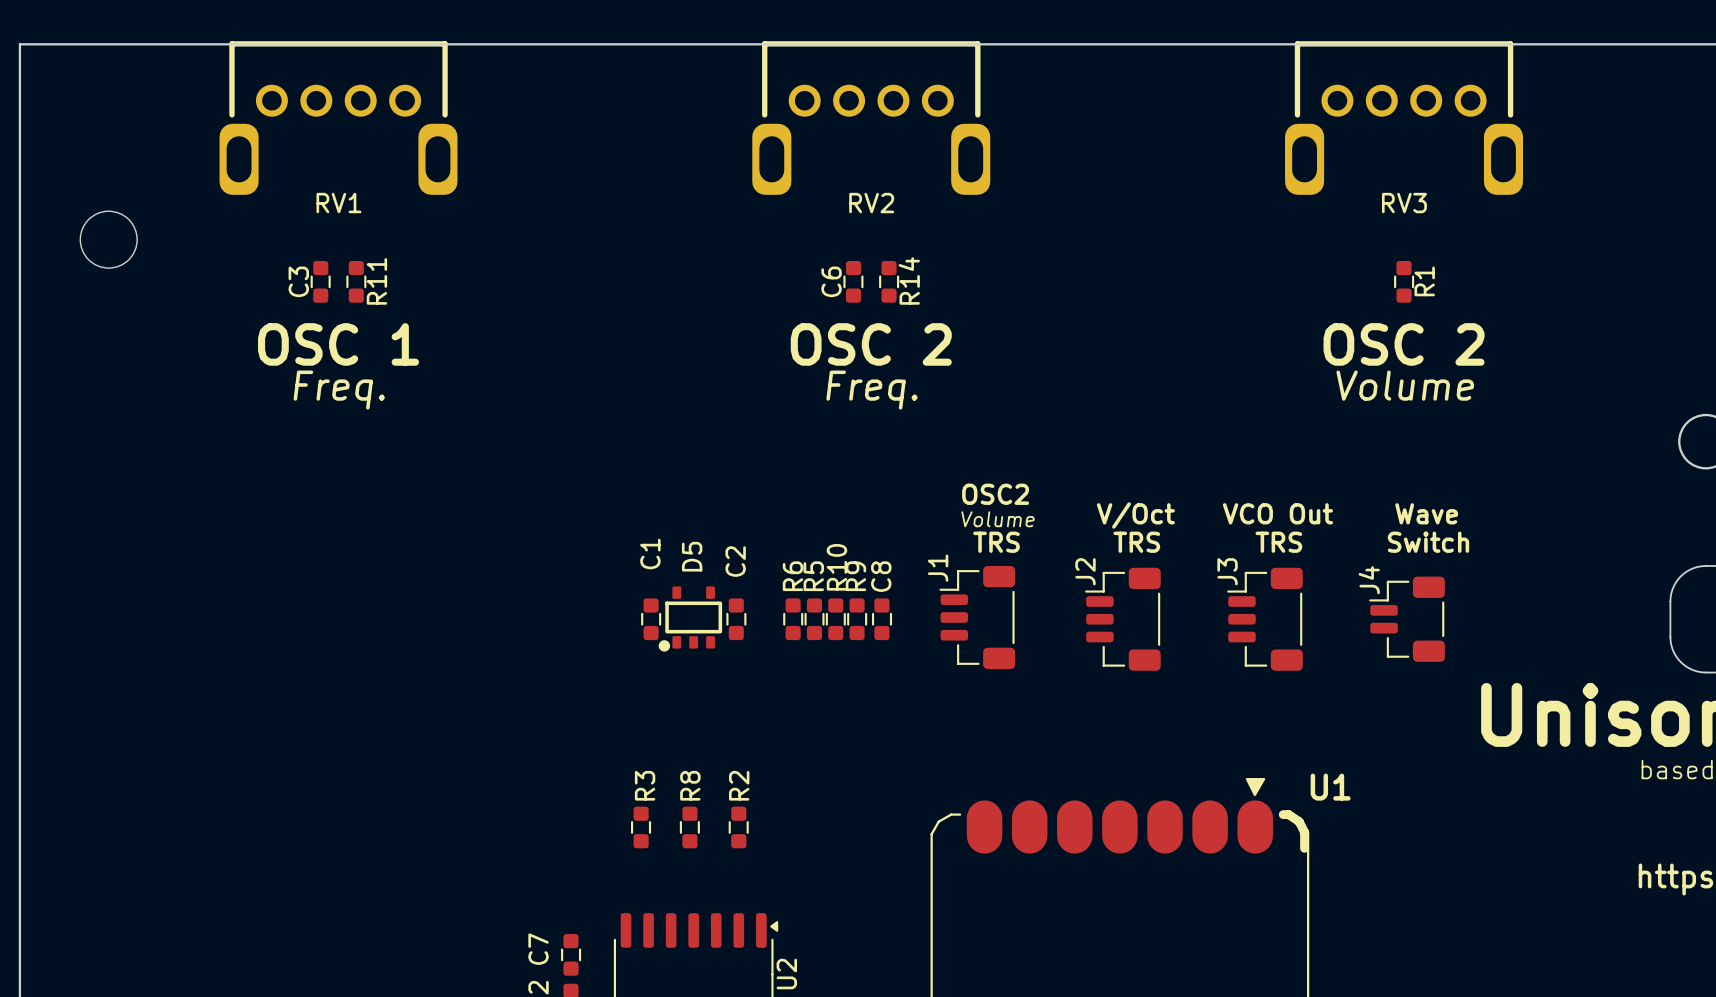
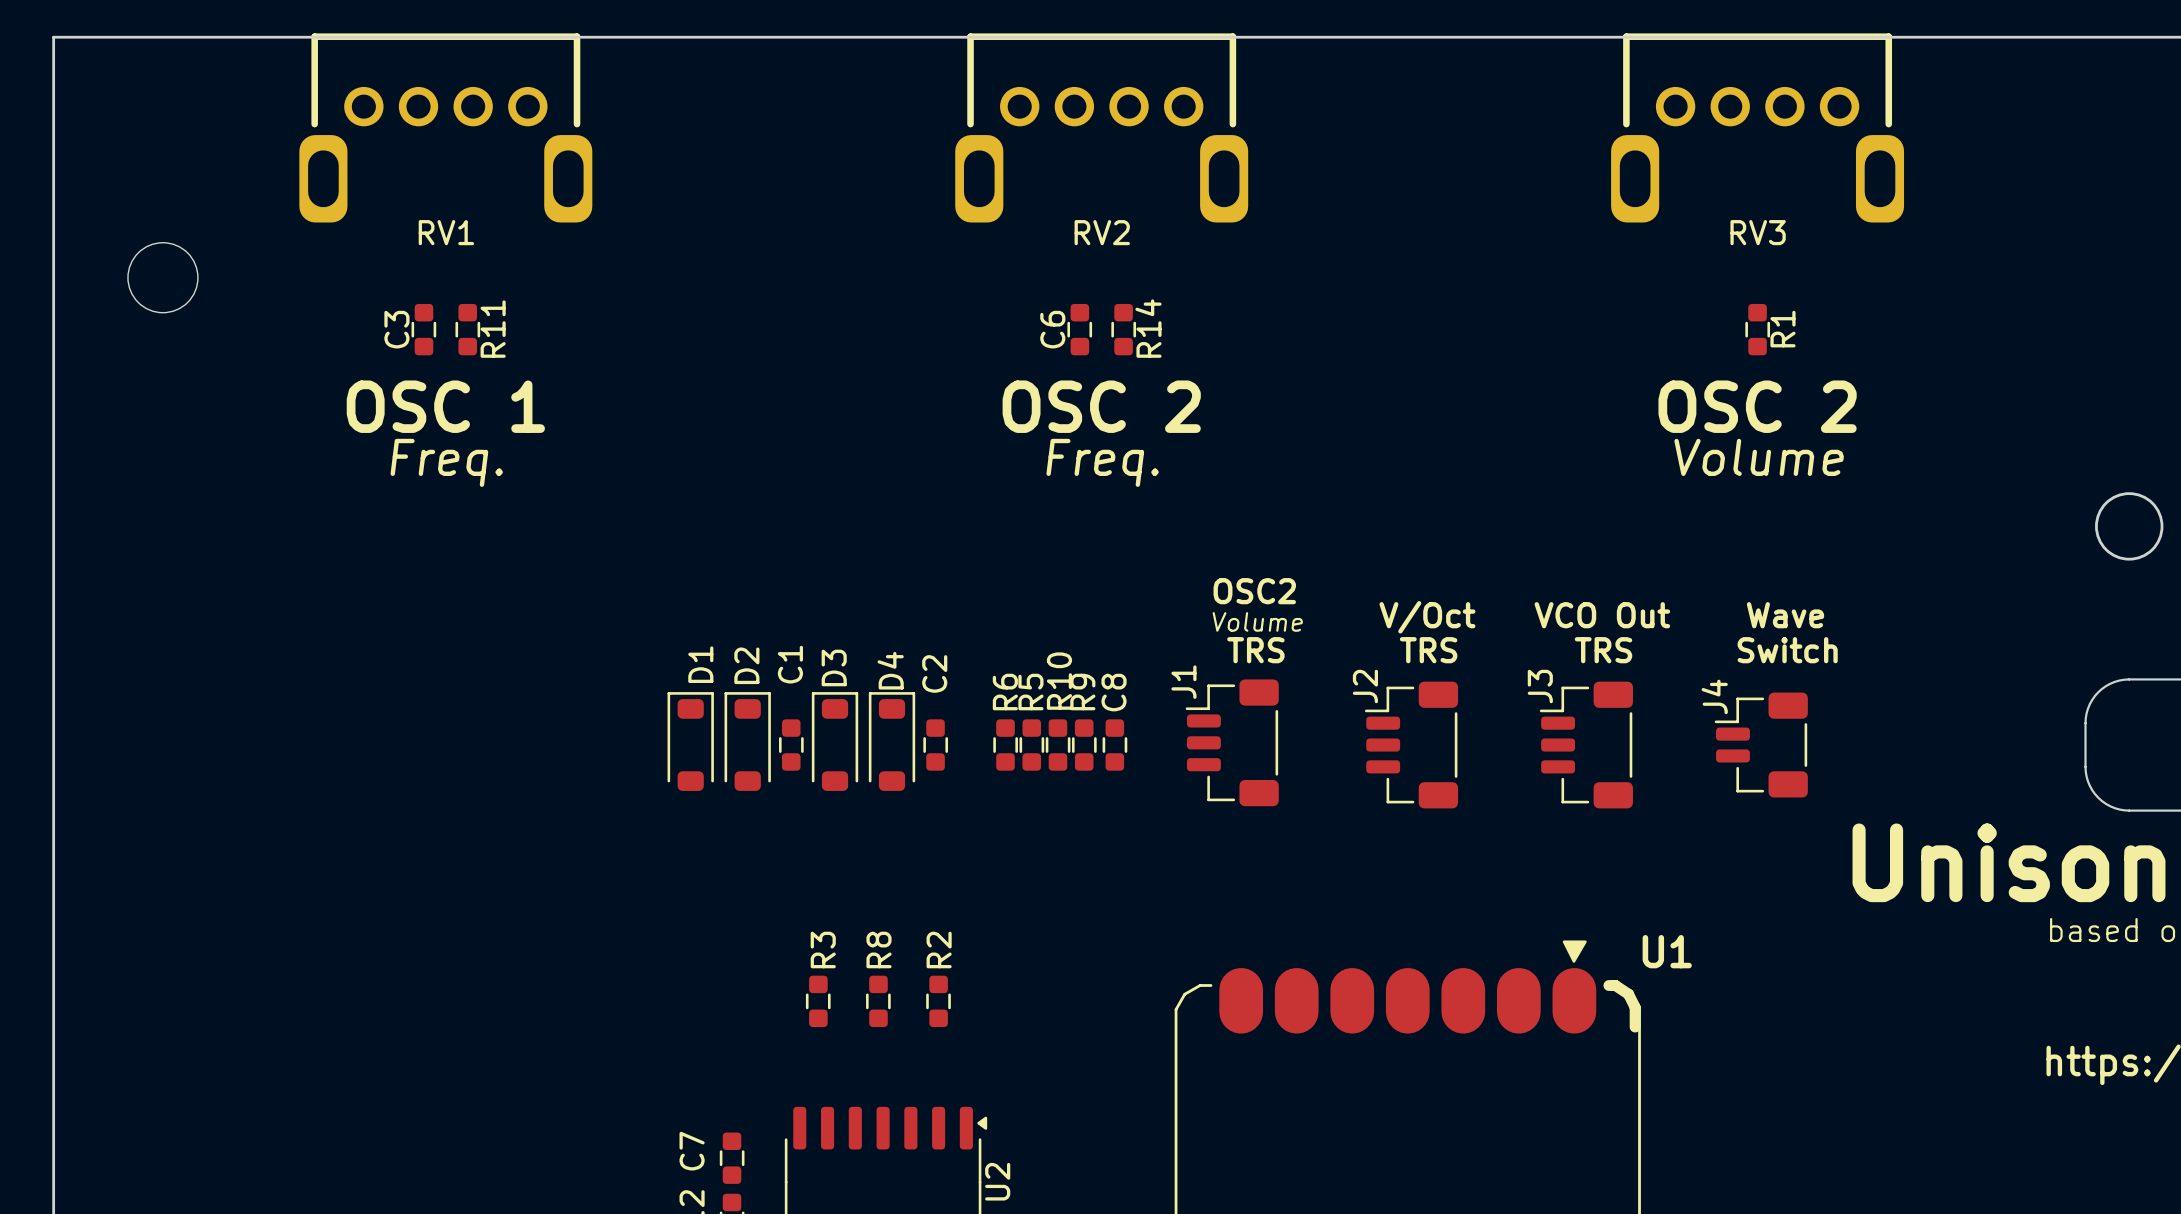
D1: none -> (690, 741)
D2: none -> (747, 741)
D3: none -> (835, 741)
D4: none -> (892, 741)
D5: (690, 618) -> none
C1 position: (651, 619) -> (791, 745)

